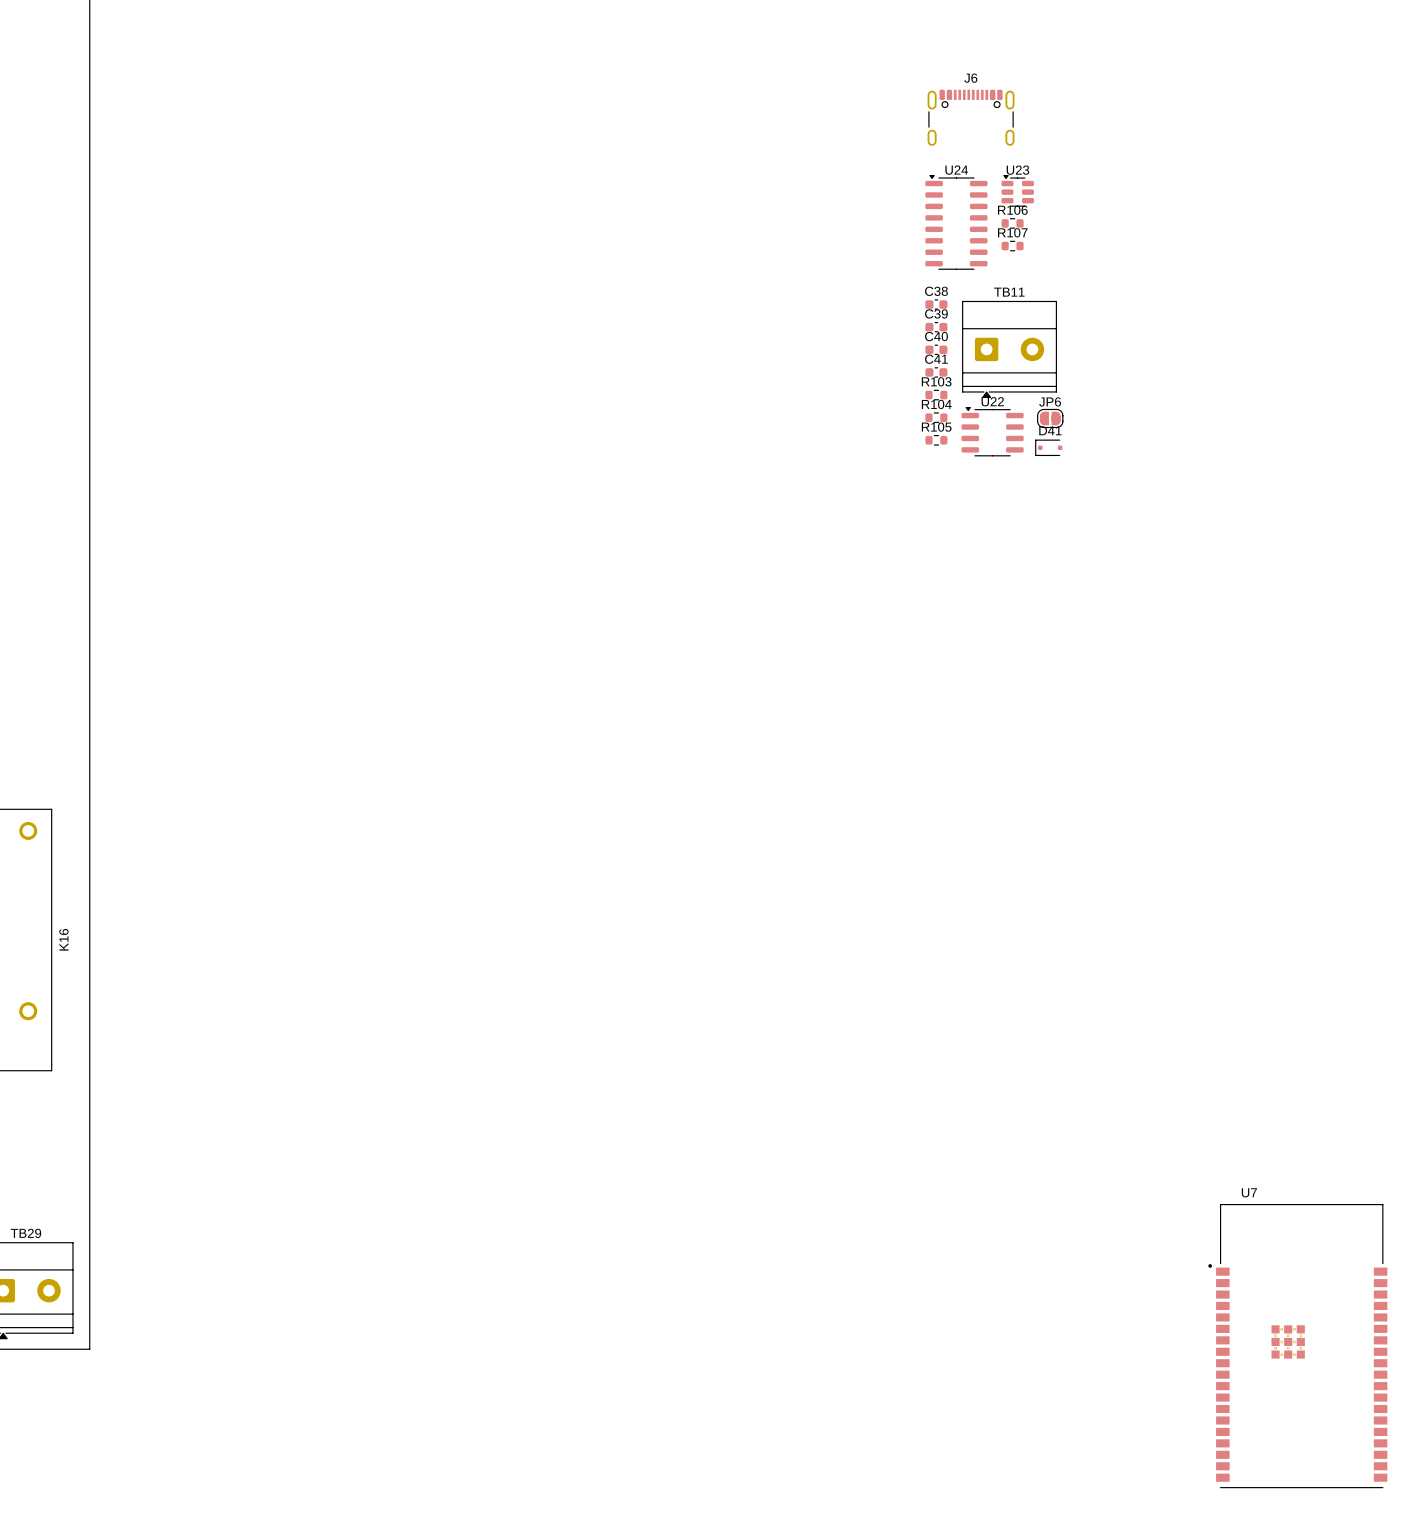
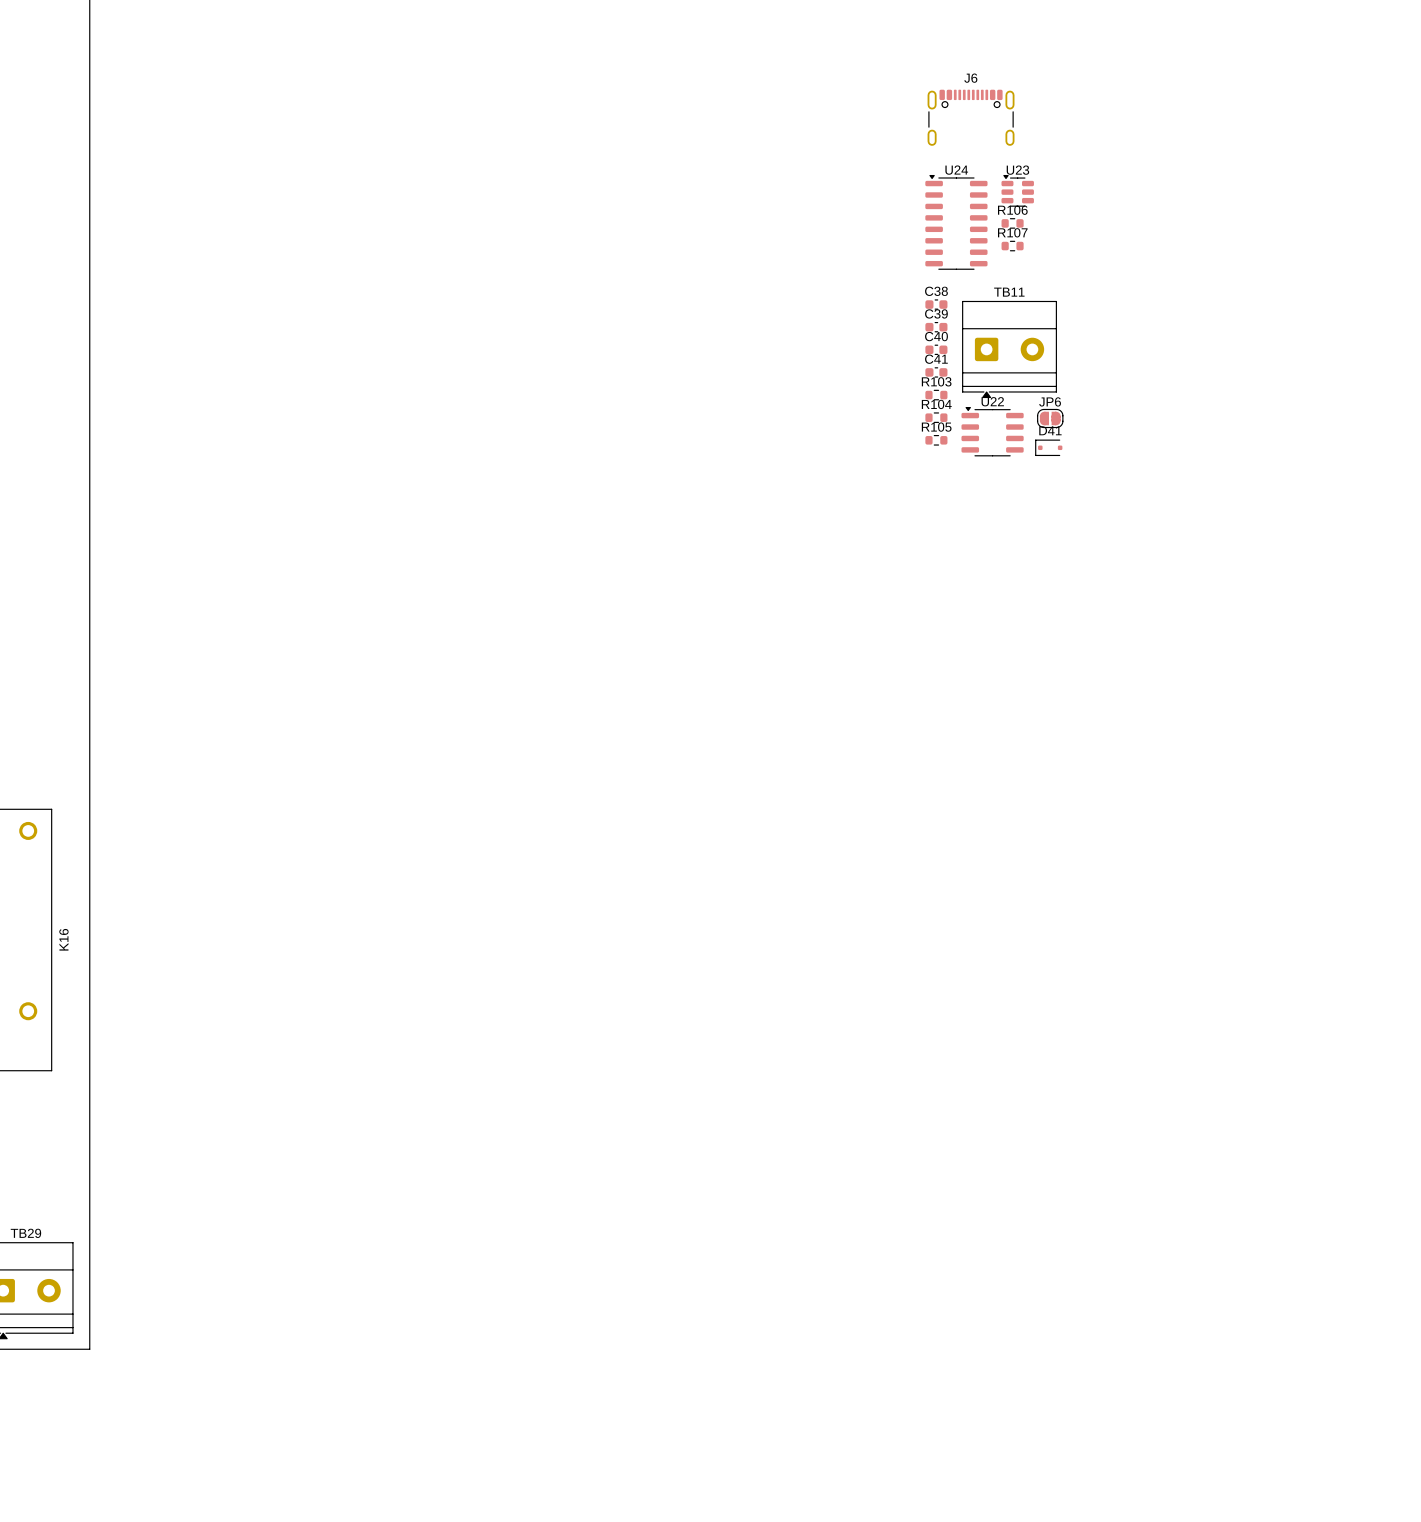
U7: (1297, 1346) -> none

